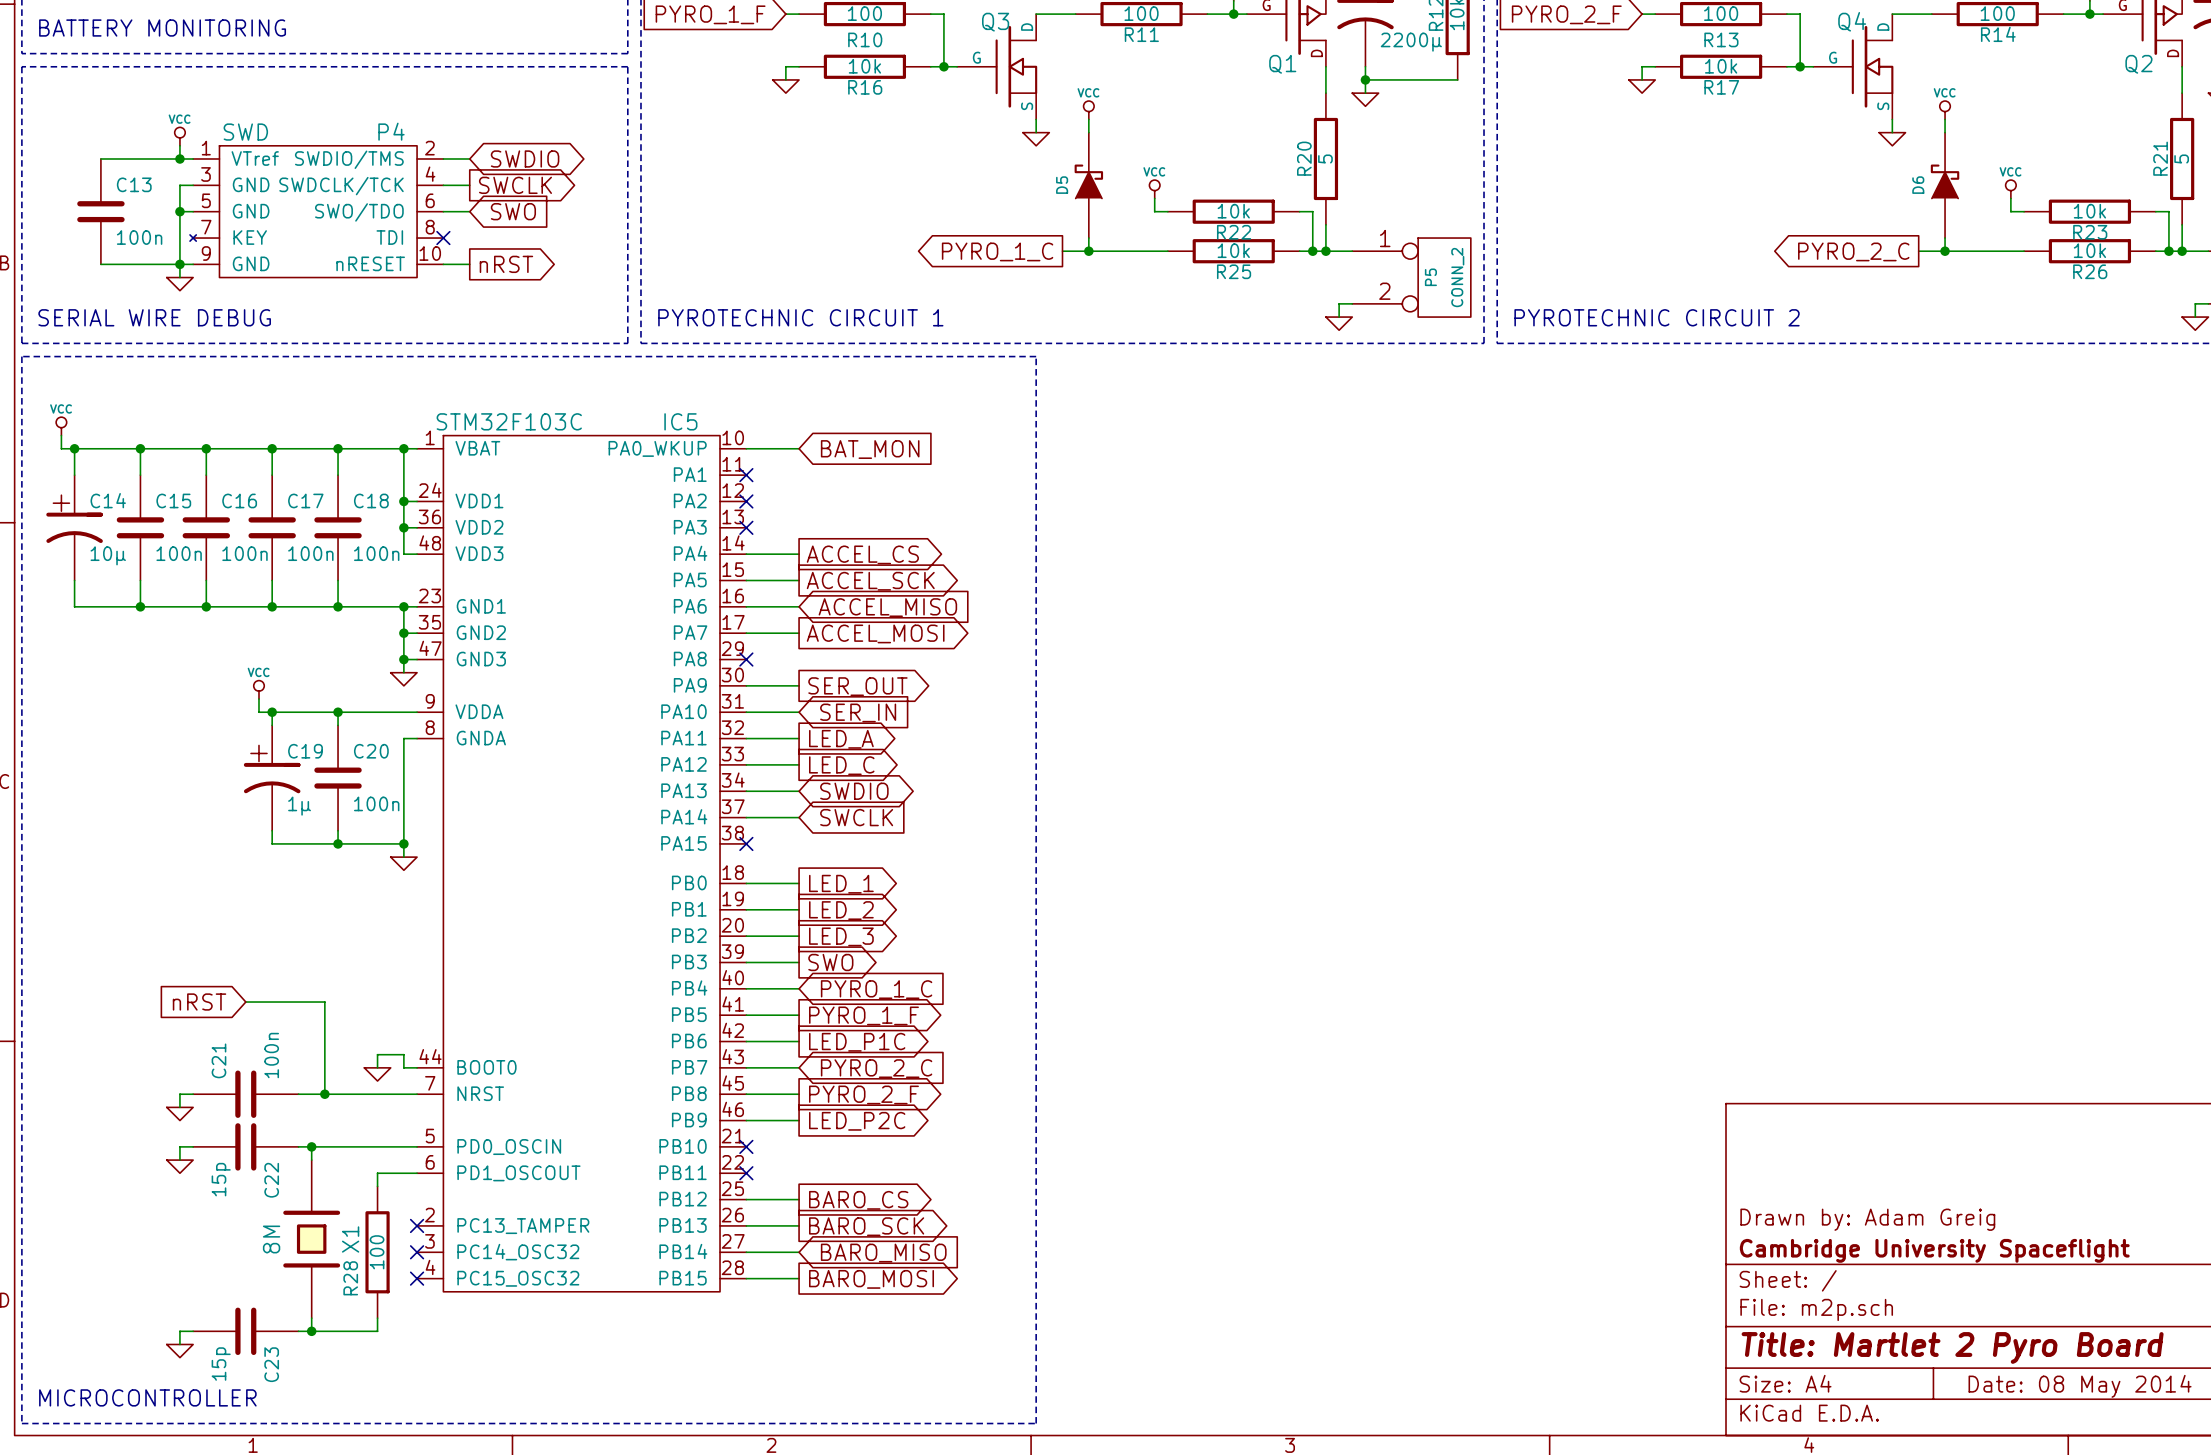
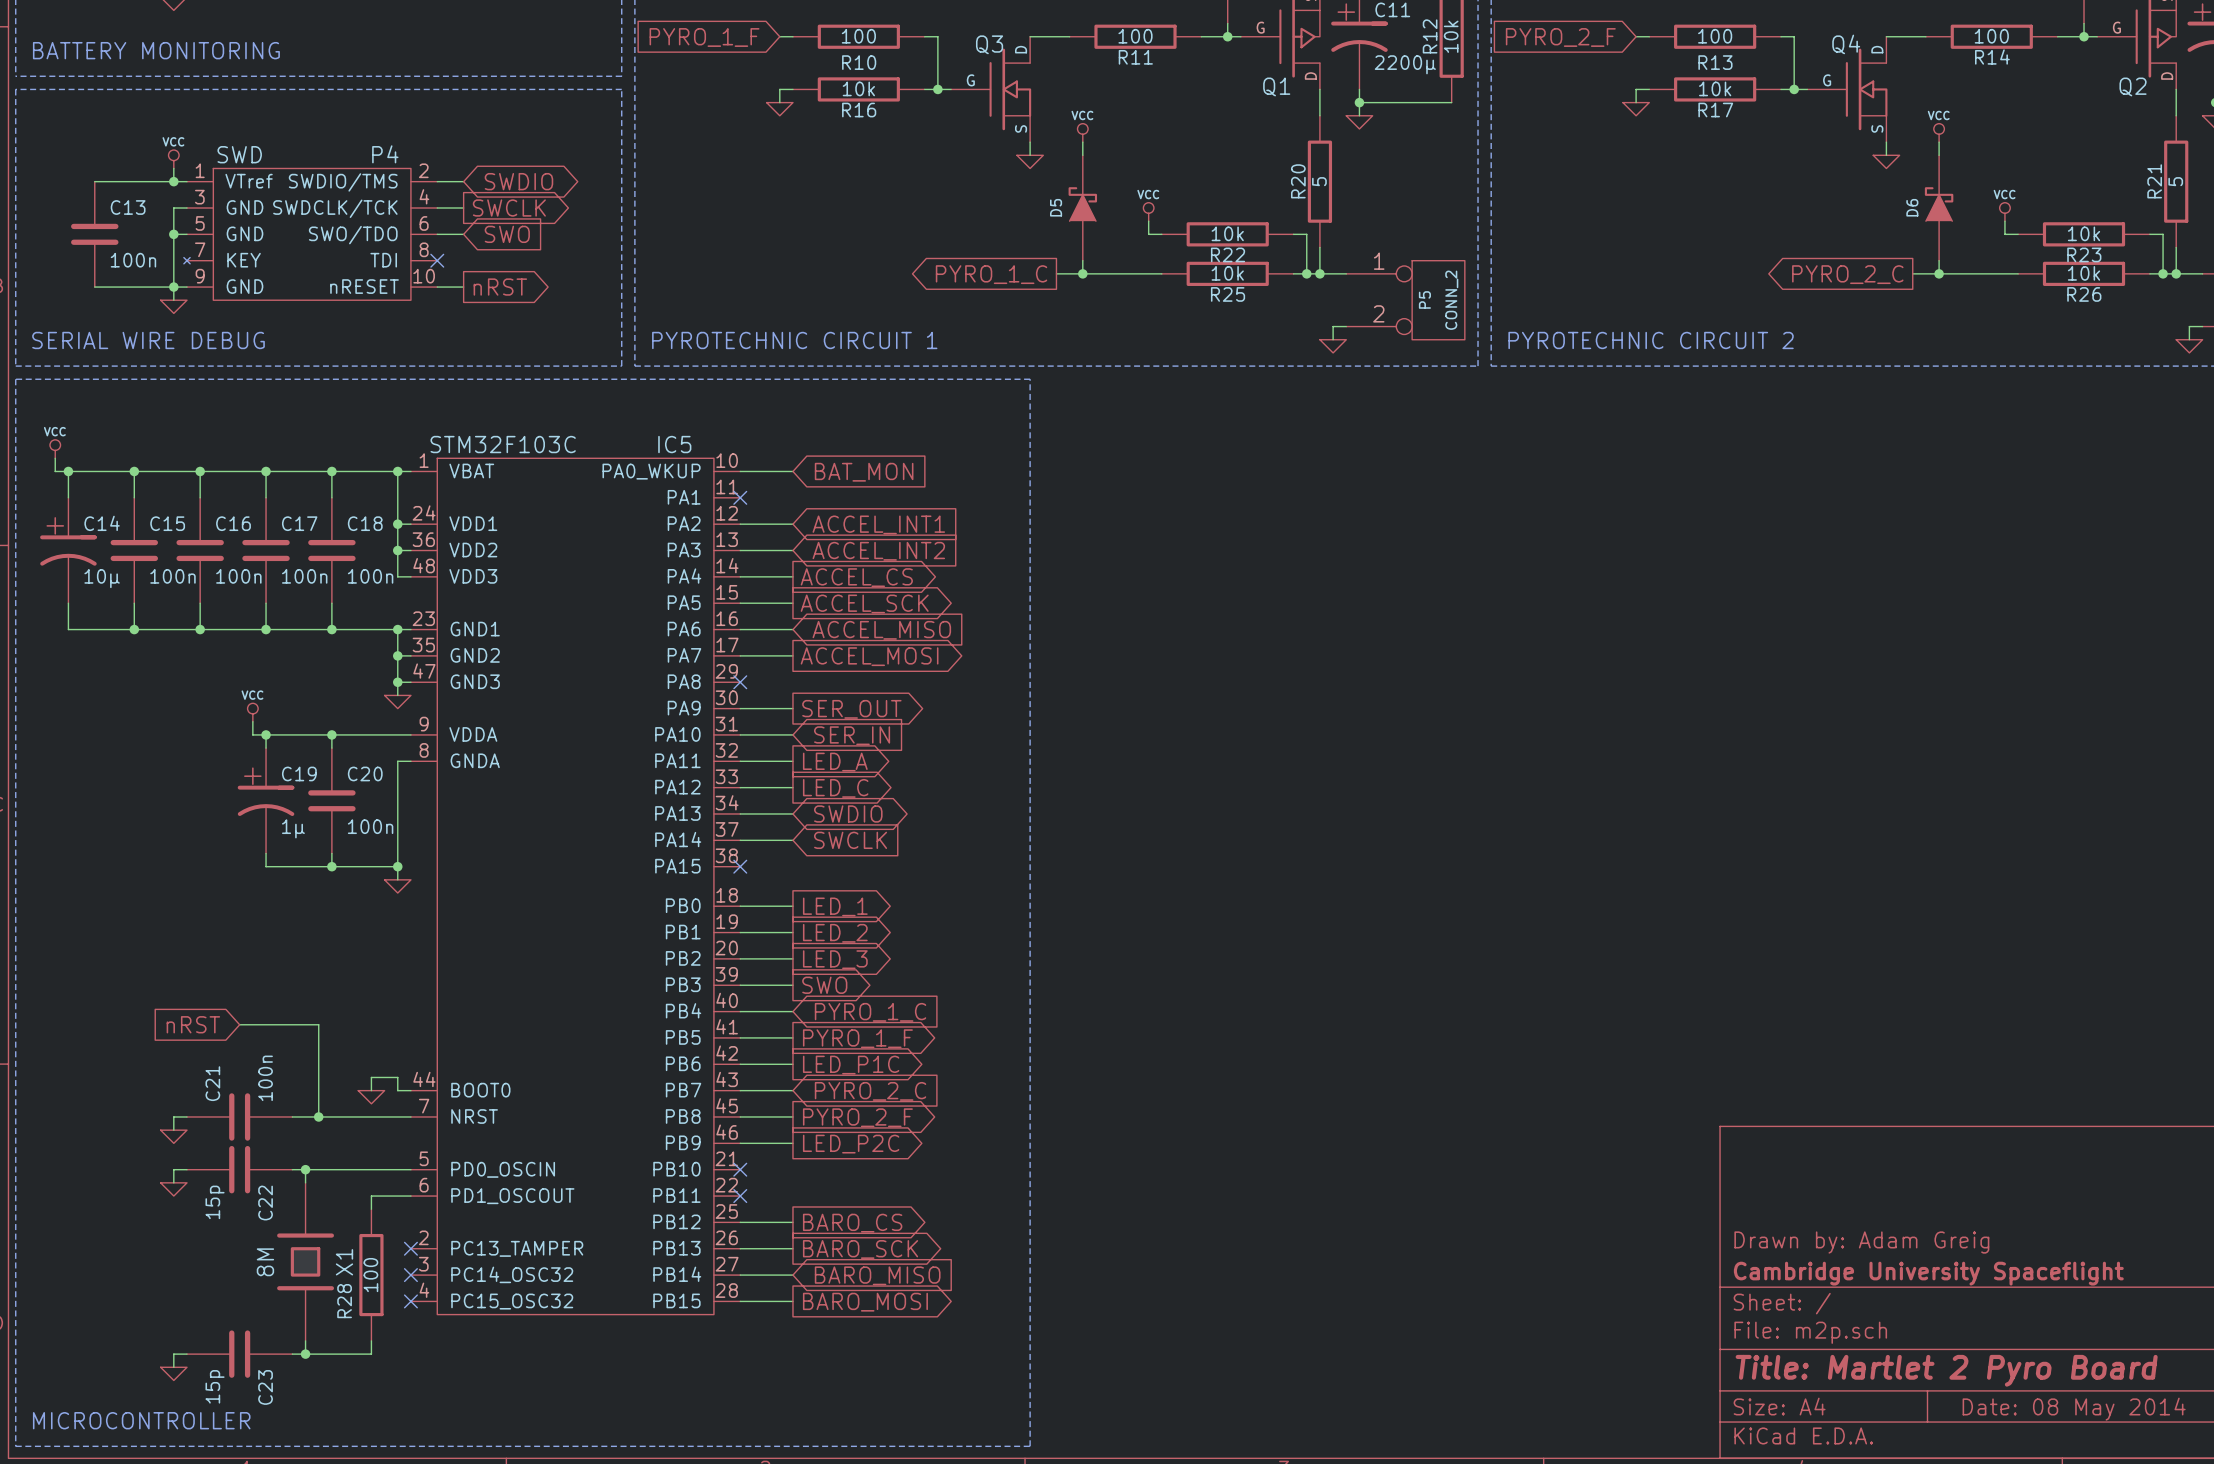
wire: none -> (740, 524) (792, 524)
no-connect mark: (746, 501) -> none
global label: none -> ACCEL_INT1 (878, 524)
wire: none -> (740, 550) (792, 550)
no-connect mark: (746, 527) -> none
global label: none -> ACCEL_INT2 (878, 551)

